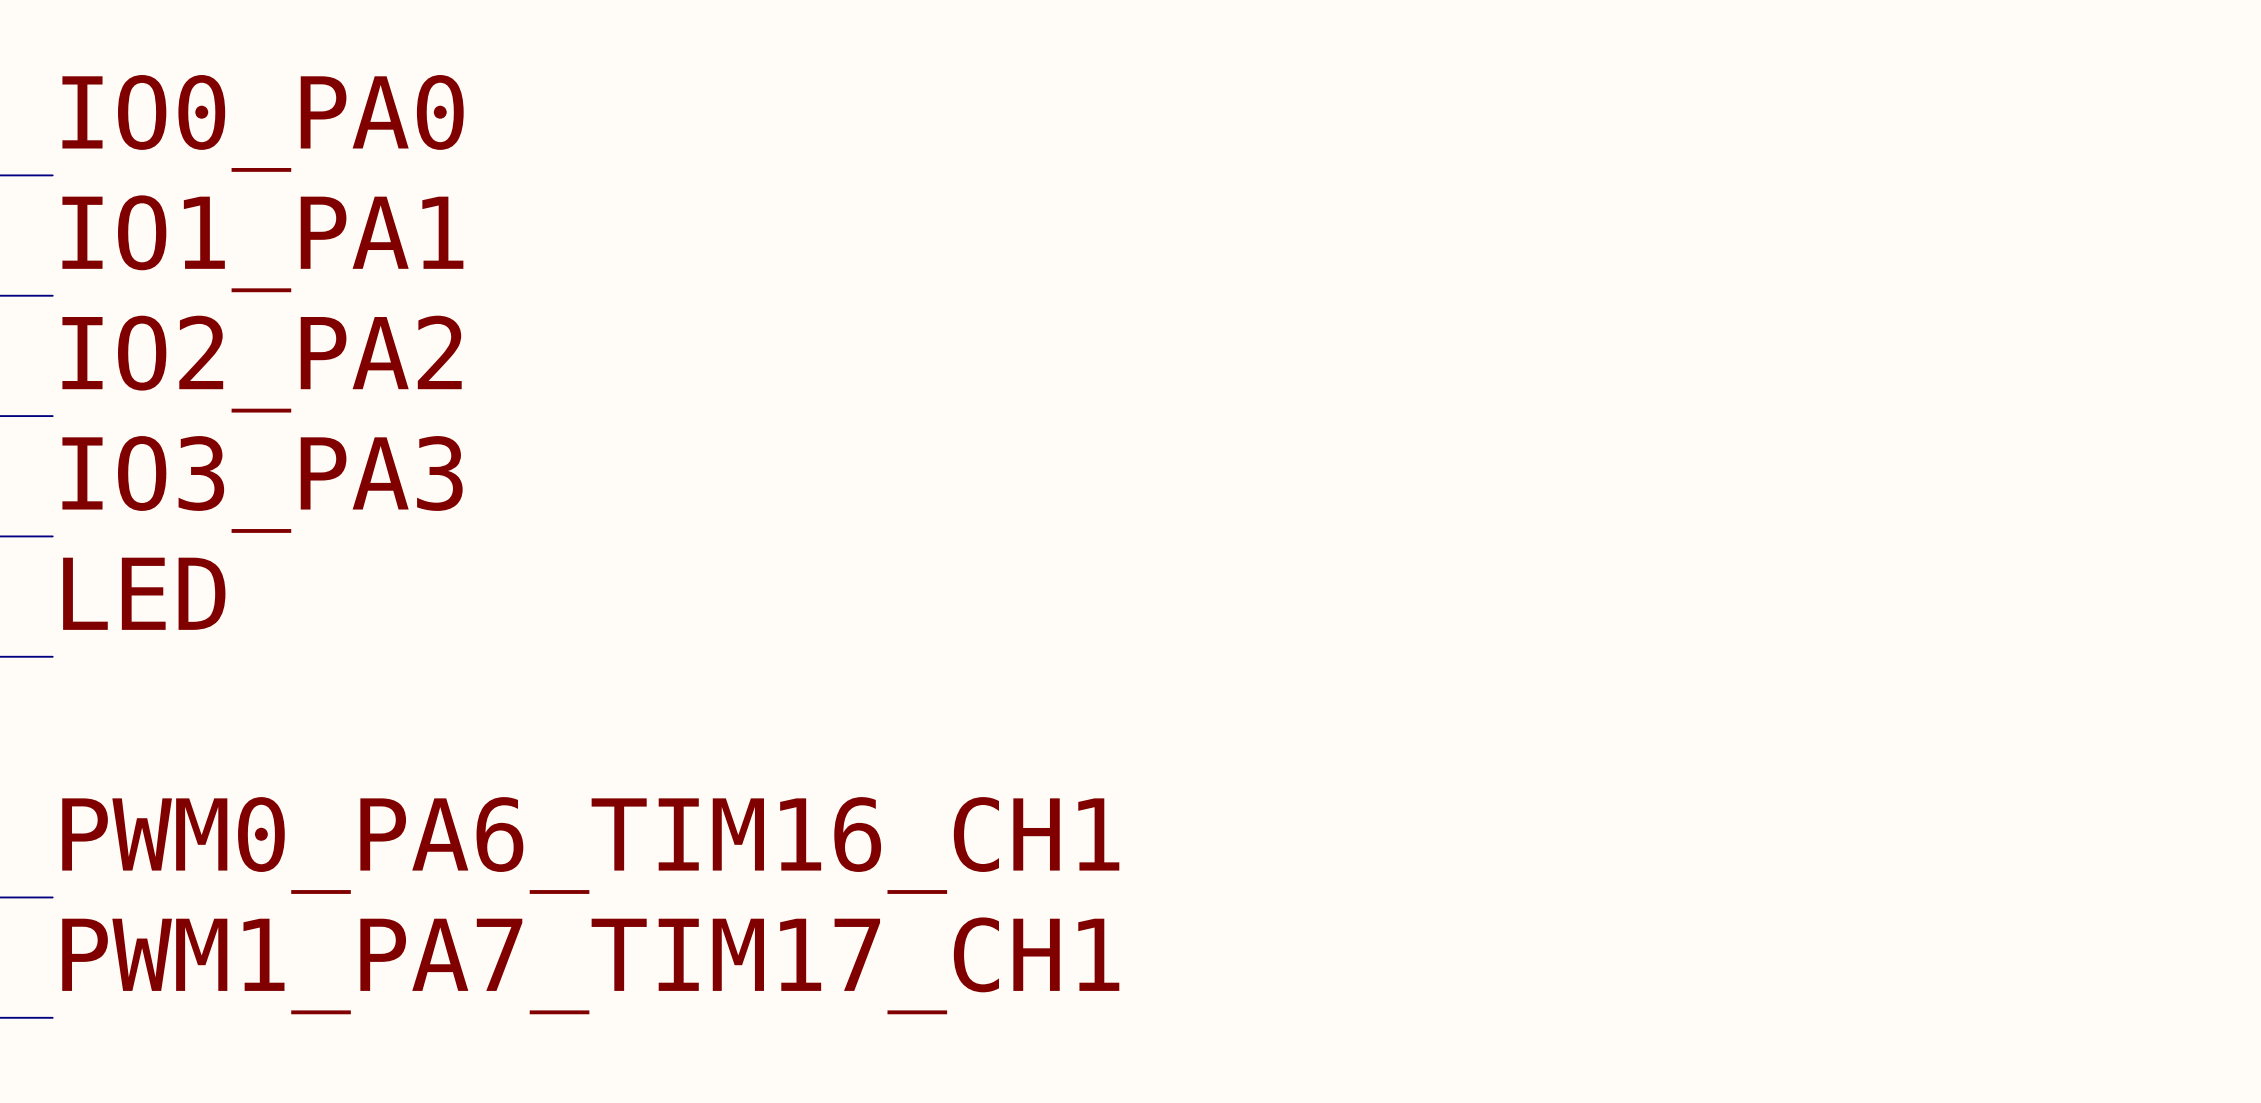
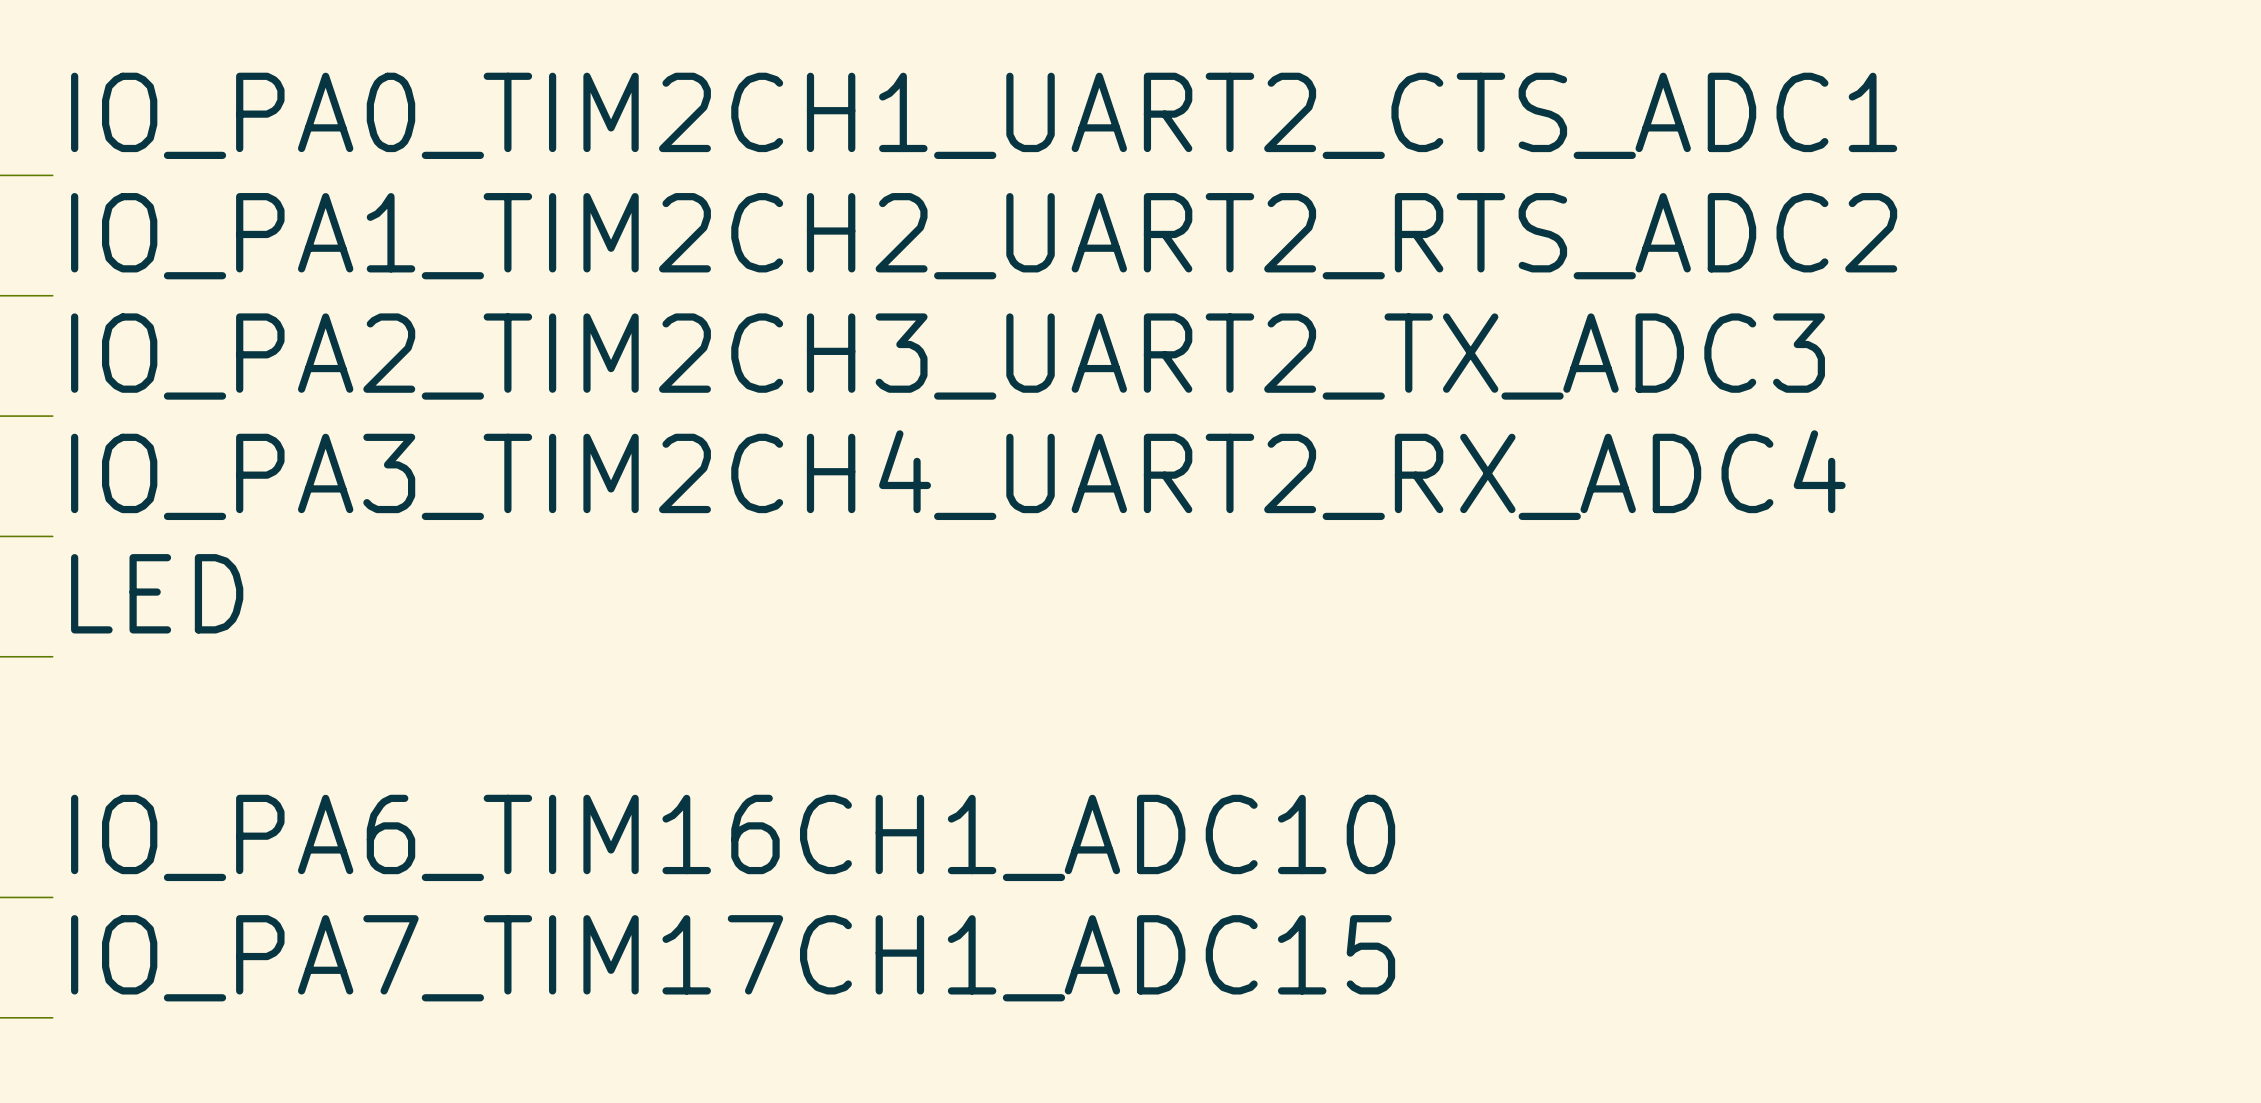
label: IO0_PA0 (263, 123) -> IO_PA0_TIM2CH1_UART2_CTS_ADC1 (984, 115)
label: IO1_PA1 (262, 243) -> IO_PA1_TIM2CH2_UART2_RTS_ADC2 (984, 236)
label: IO2_PA2 (262, 364) -> IO_PA2_TIM2CH3_UART2_TX_ADC3 (948, 356)
label: IO3_PA3 (262, 484) -> IO_PA3_TIM2CH4_UART2_RX_ADC4 (958, 475)
label: PWM0_PA6_TIM16_CH1 (590, 845) -> IO_PA6_TIM16CH1_ADC10 (733, 837)
label: PWM1_PA7_TIM17_CH1 (590, 965) -> IO_PA7_TIM17CH1_ADC15 (733, 958)

